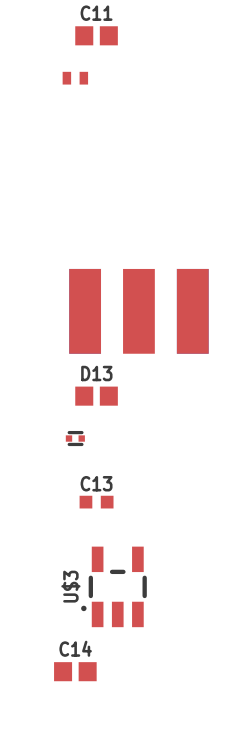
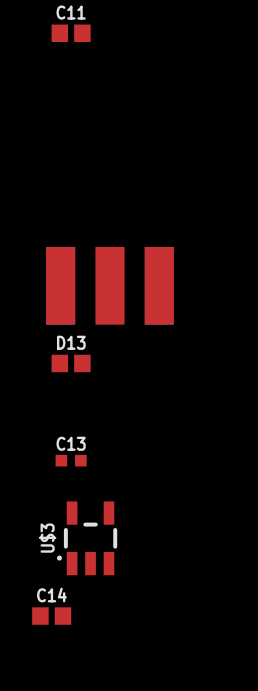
part: (75, 78) -> none
part: (75, 438) -> none

